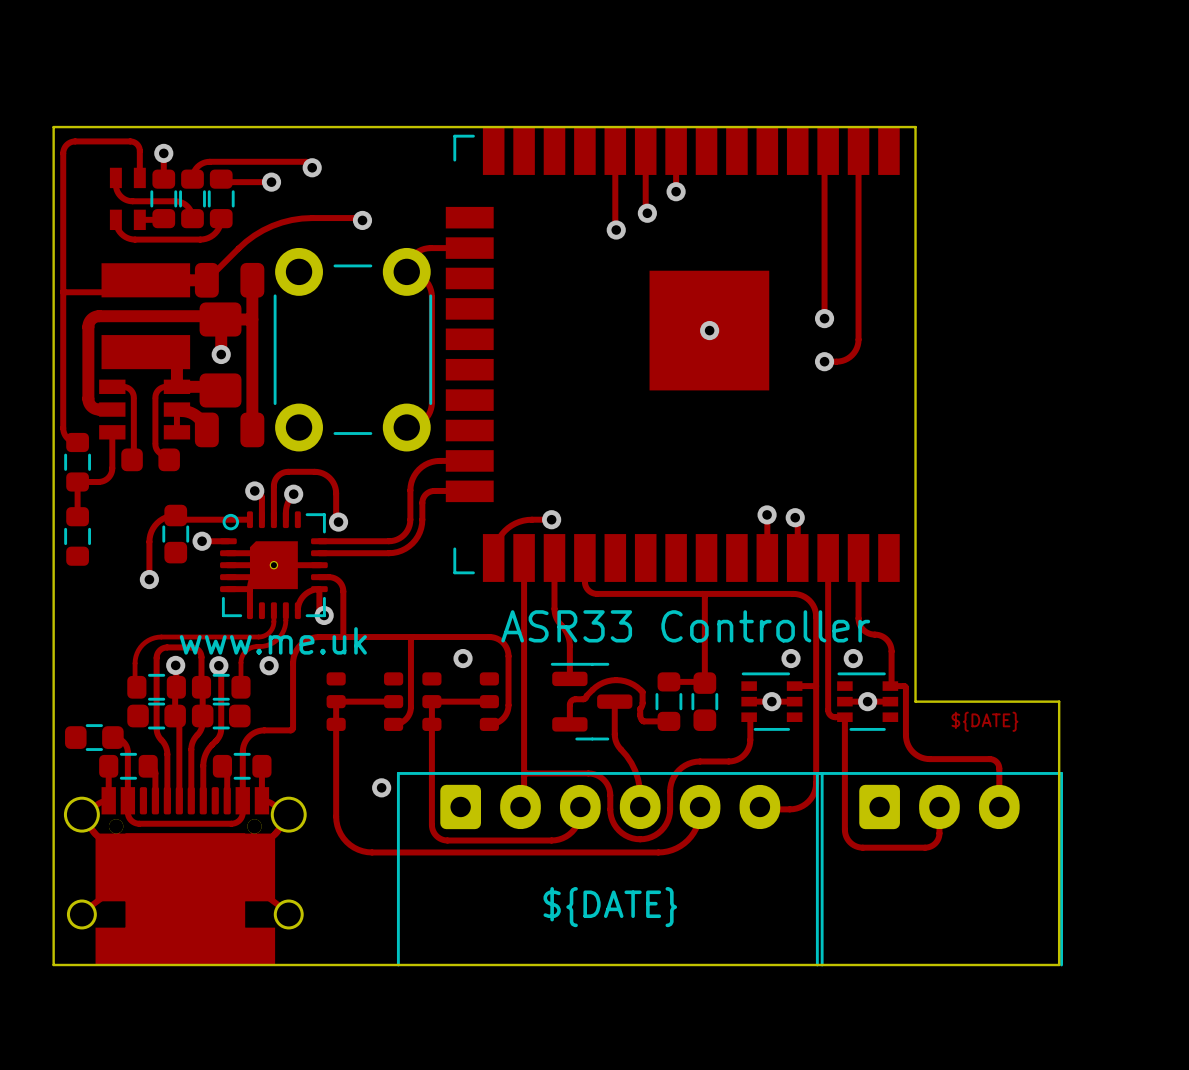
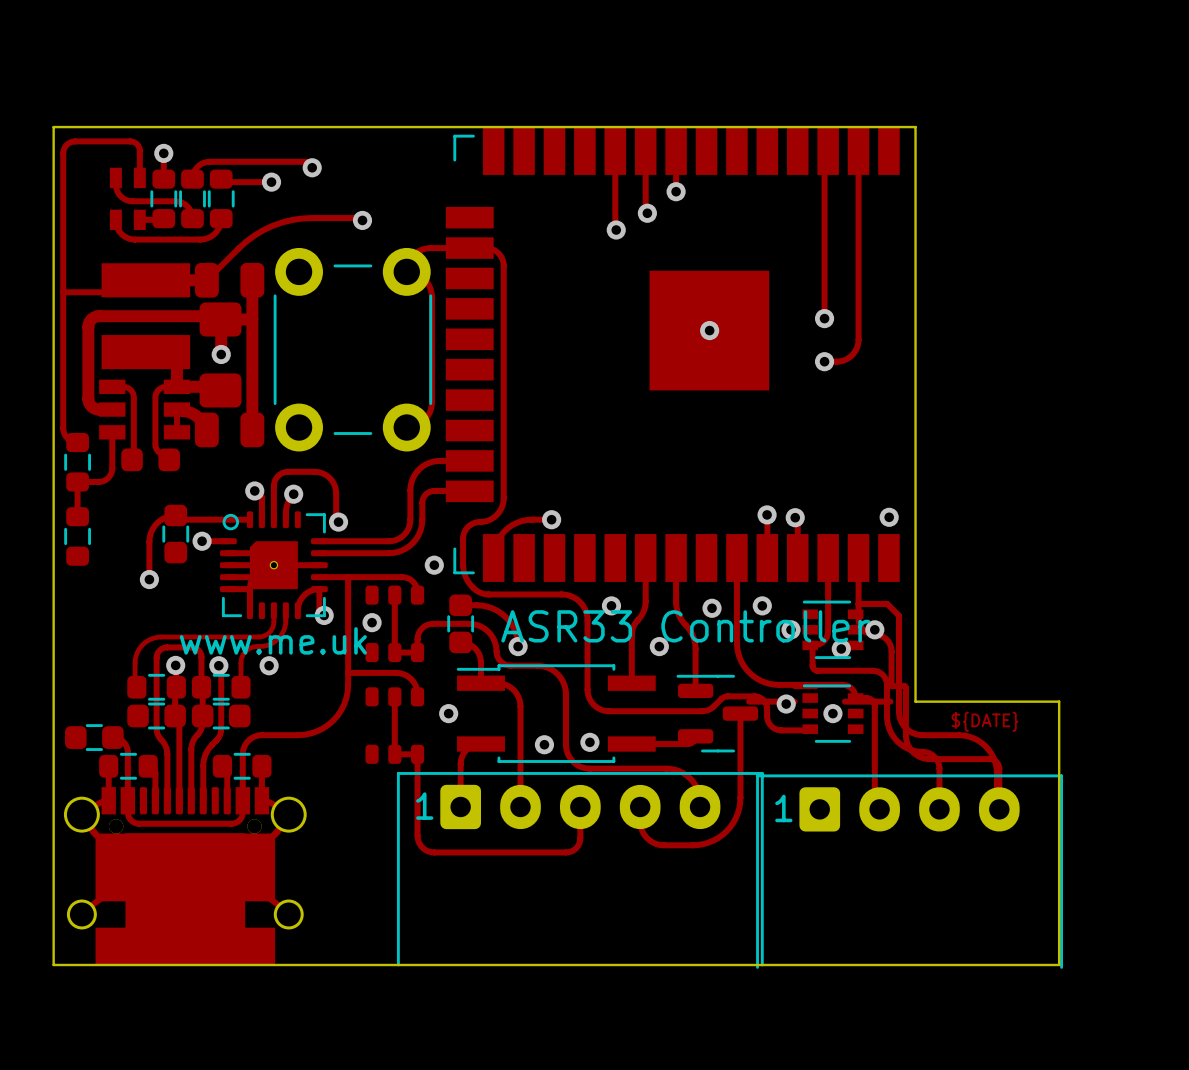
track: none -> (469, 248) (493, 249) (501, 256) (503, 263) (503, 498) (501, 508) (494, 516) (487, 520) (472, 523) (463, 533) (463, 568) (469, 583) (478, 591) (485, 594) (564, 594) (579, 602) (587, 617) (587, 692) (591, 702) (600, 709) (609, 711) (703, 711) (711, 708) (725, 696) (756, 696) (765, 702) (768, 721) (774, 728) (781, 730) (810, 729)
via: none -> (889, 517)
track: (524, 558) (524, 804) (521, 806) -> (460, 642) (471, 645) (478, 653) (480, 683) (504, 684) (513, 690) (519, 698) (520, 806)
track: (554, 558) (554, 611) (557, 619) (566, 632) (569, 640) (569, 678) -> none
track: (584, 558) (585, 584) (589, 591) (595, 593) (793, 593) (802, 595) (811, 602) (816, 616) (815, 789) (808, 801) (796, 808) (762, 809) (759, 806) -> none
track: none -> (645, 558) (645, 606) (631, 632) (631, 683)
track: none -> (676, 558) (676, 605) (679, 617) (691, 632) (694, 642) (695, 690)
track: none -> (736, 558) (737, 647) (741, 661) (749, 672) (760, 680) (774, 684) (845, 685) (852, 689) (855, 698) (868, 698) (873, 702) (874, 804) (879, 809)
via: none -> (434, 565)
track: (328, 577) (337, 580) (342, 587) (343, 637) -> (328, 577) (406, 577) (415, 584) (417, 595)
track: (702, 593) (704, 596) (704, 683) (668, 681) -> none
track: none -> (394, 595) (394, 652) (417, 652) (419, 632) (423, 627) (429, 624) (469, 623) (482, 627) (492, 637) (497, 656) (503, 663) (544, 666) (560, 676) (565, 690) (566, 750) (575, 763) (587, 768) (666, 768) (679, 771) (686, 775) (695, 785) (698, 793) (700, 806)
track: none -> (858, 603) (887, 603) (898, 615) (898, 711) (903, 725) (916, 734) (962, 735) (982, 743) (991, 753) (995, 764) (996, 807) (999, 809)
track: none -> (460, 605) (487, 606) (501, 613) (514, 630) (518, 646)
via: none -> (611, 605)
via: none -> (762, 605)
via: none -> (712, 608)
via: none -> (372, 622)
part: none -> (394, 623)
part: none -> (460, 623)
via: none -> (791, 629)
part: none -> (832, 629)
via: none -> (874, 629)
track: (828, 631) (828, 710) (832, 716) (844, 717) (844, 829) (847, 838) (853, 845) (860, 847) (928, 847) (935, 843) (938, 837) (939, 809) -> (828, 631) (822, 642) (810, 645) (812, 647) (813, 668) (817, 670) (874, 670) (882, 674) (886, 683) (887, 720) (892, 735) (903, 746) (914, 751) (929, 753) (937, 761) (939, 806)
track: (412, 637) (410, 638) (410, 711) (404, 720) (393, 724) -> none
via: none -> (518, 646)
via: none -> (659, 646)
via: (463, 658) -> none
via: (791, 658) -> none
via position: (853, 658) -> (841, 648)
track: none -> (348, 672) (404, 674) (414, 683) (417, 696)
part footprint: [691, 672, 719, 731] -> [676, 674, 759, 753]
part: (364, 701) -> none
track: (393, 701) (336, 701) (337, 825) (346, 841) (362, 851) (434, 852) -> (394, 696) (394, 754) (417, 754) (417, 839) (423, 848) (434, 852)
part: (460, 701) -> none
track: (489, 701) (431, 701) (431, 824) (435, 834) (439, 838) (447, 840) (555, 840) (565, 836) (574, 829) (580, 811) -> none
part: (591, 701) -> none
track: (614, 701) (615, 738) (635, 770) (639, 787) (640, 806) -> (740, 713) (740, 803) (735, 818) (726, 831) (718, 838) (703, 844) (658, 844) (649, 840) (642, 831) (640, 806)
part: (668, 701) -> none
part: (771, 701) -> none
via position: (771, 701) -> (786, 704)
part: (867, 701) -> none
via: (867, 701) -> none
via: none -> (448, 713)
part: none -> (556, 713)
part: none -> (832, 713)
via: none -> (832, 713)
track: (749, 717) (750, 742) (745, 753) (734, 760) (696, 761) (681, 767) (674, 776) (671, 783) (667, 820) (661, 830) (647, 838) (632, 838) (621, 833) (616, 827) (610, 813) (609, 789) (605, 782) (599, 776) (588, 773) (526, 773) (524, 775) -> none
track: (668, 721) (642, 720) (640, 715) (642, 692) (629, 682) (616, 680) (599, 684) (584, 698) (571, 700) (569, 724) -> none
track: (489, 724) (501, 720) (508, 707) (508, 653) (505, 646) (498, 639) (489, 637) (315, 637) (303, 642) (293, 656) (292, 729) (261, 730) (253, 733) (245, 741) (242, 754) -> (348, 577) (348, 684) (346, 697) (341, 710) (328, 724) (310, 733) (254, 736) (246, 742) (242, 754)
part: none -> (394, 725)
track: none -> (695, 736) (693, 741) (688, 743) (631, 744)
via: none -> (589, 742)
track: none -> (480, 744) (468, 748) (461, 757) (460, 806)
via: none -> (544, 744)
via: (381, 787) -> none
track: (700, 806) (699, 820) (693, 832) (684, 843) (672, 850) (658, 852) (565, 852) -> (580, 811) (579, 843) (574, 849) (565, 852)
part: none -> (580, 869)
part: (610, 869) -> none
part: (939, 869) -> none
part: none -> (909, 871)
text: ${DATE} (610, 907) -> none

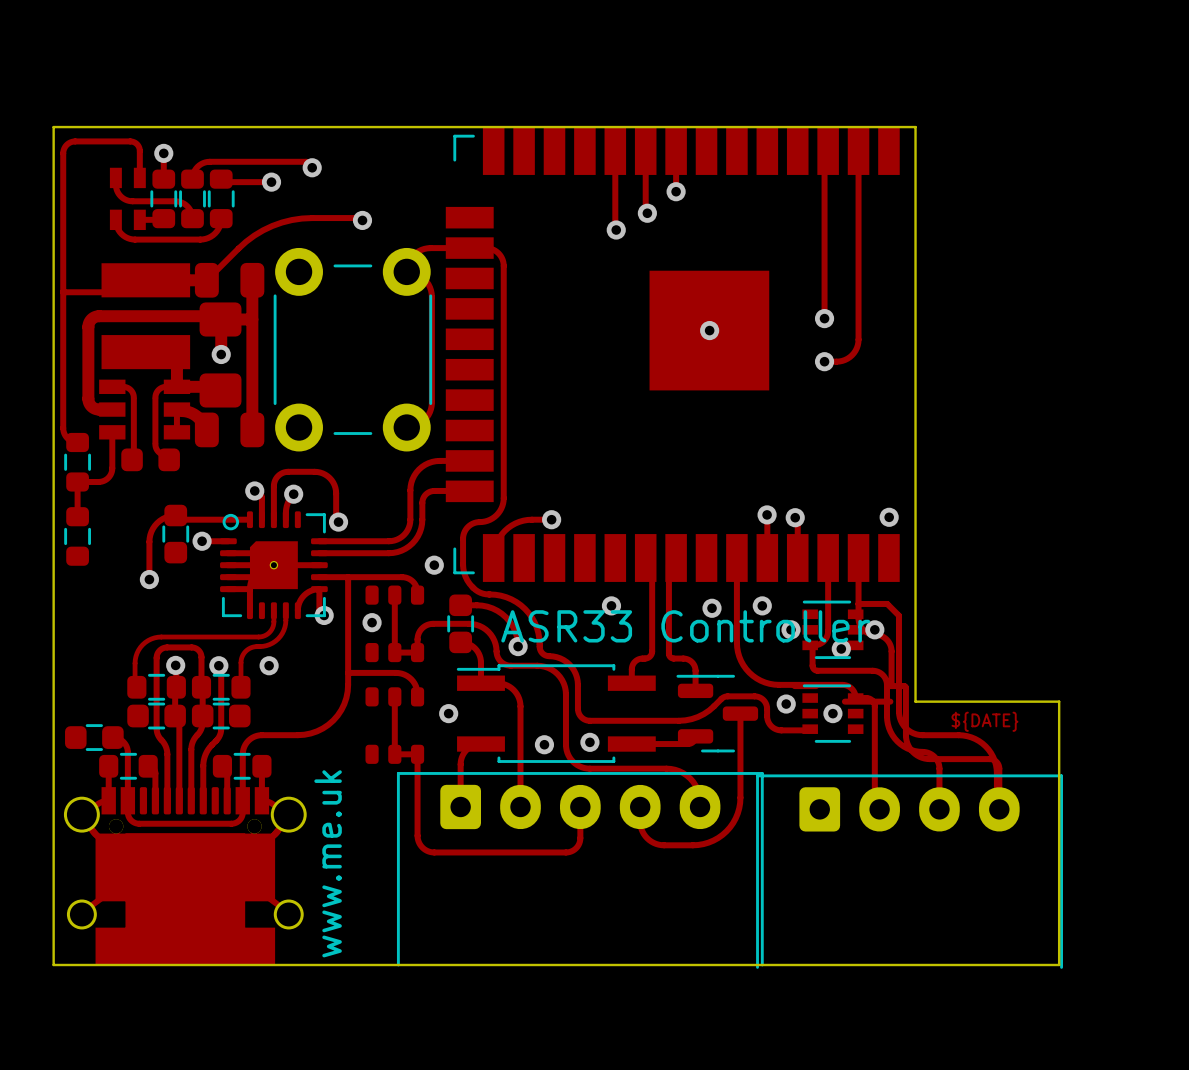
track: (676, 558) (676, 608) (679, 617) (694, 639) (695, 670) -> (676, 558) (671, 559) (668, 564) (668, 654) (672, 658) (689, 660) (693, 664) (695, 670)
track: (645, 570) (645, 606) (631, 632) (631, 669) -> (645, 570) (647, 575) (652, 577) (652, 652) (648, 657) (636, 660) (631, 669)
track: (489, 594) (564, 594) (579, 602) (587, 617) (587, 692) (590, 700) (598, 708) (609, 711) (702, 711) (714, 706) -> (489, 594) (506, 597) (520, 605) (534, 622) (541, 652) (546, 655) (560, 658) (572, 667) (577, 681) (578, 711) (583, 719) (589, 720) (685, 720) (697, 717) (714, 706)
text rotation: 0° (273, 640) -> 90° counterclockwise (328, 863)
via: (659, 646) -> none
track: (749, 701) (794, 701) -> none
part text: 1 (424, 806) -> none
part text: 1 (783, 808) -> none

